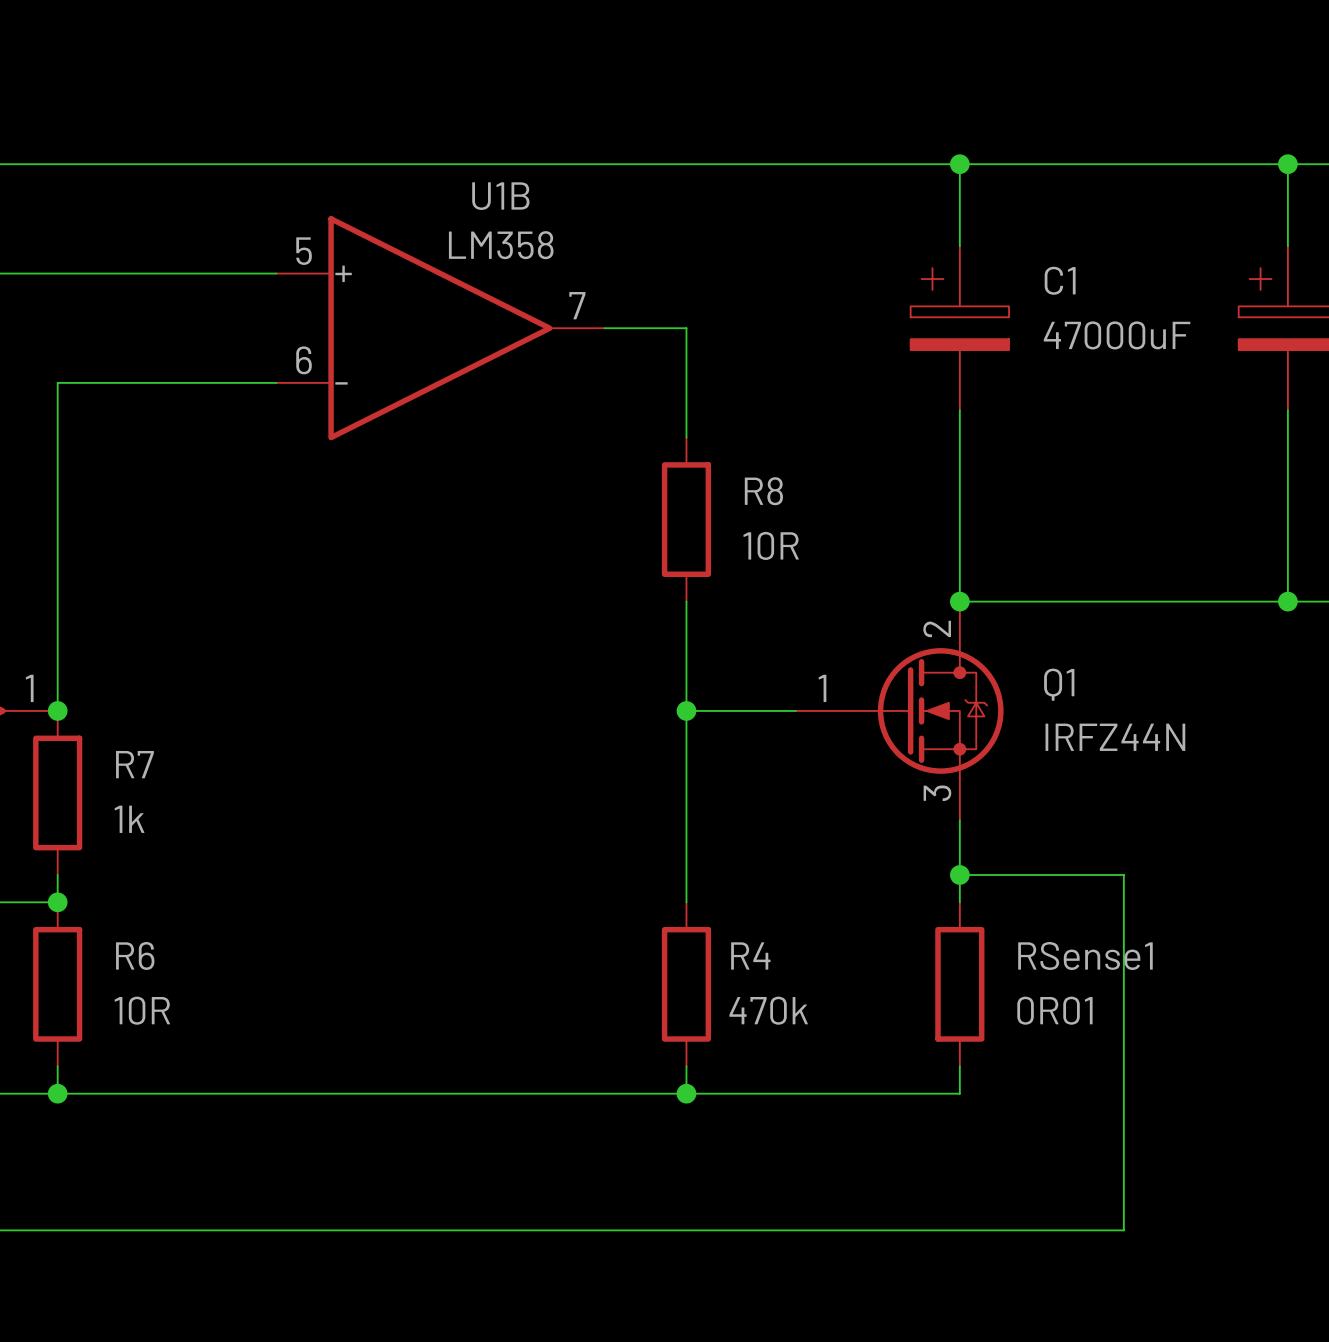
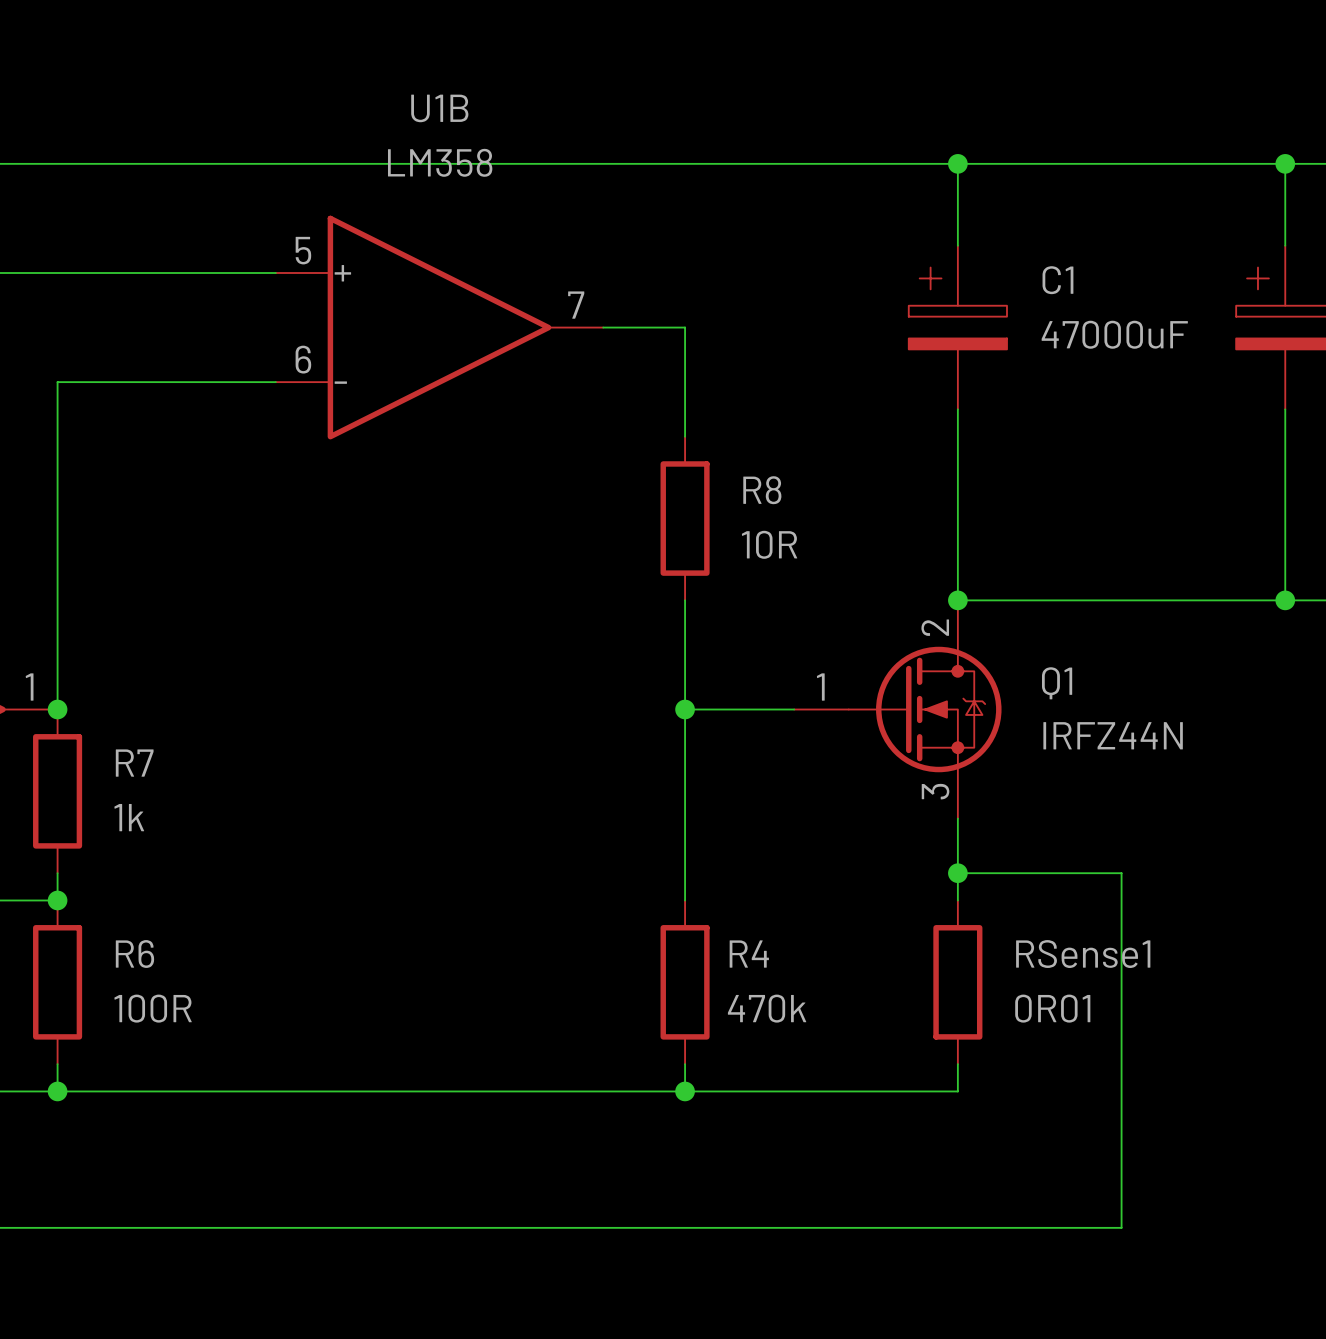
U1B name position: U1B (500, 196) -> U1B (439, 108)
U1B value position: LM358 (501, 245) -> LM358 (440, 162)
R6 value: 10R (142, 1010) -> 100R (153, 1008)

